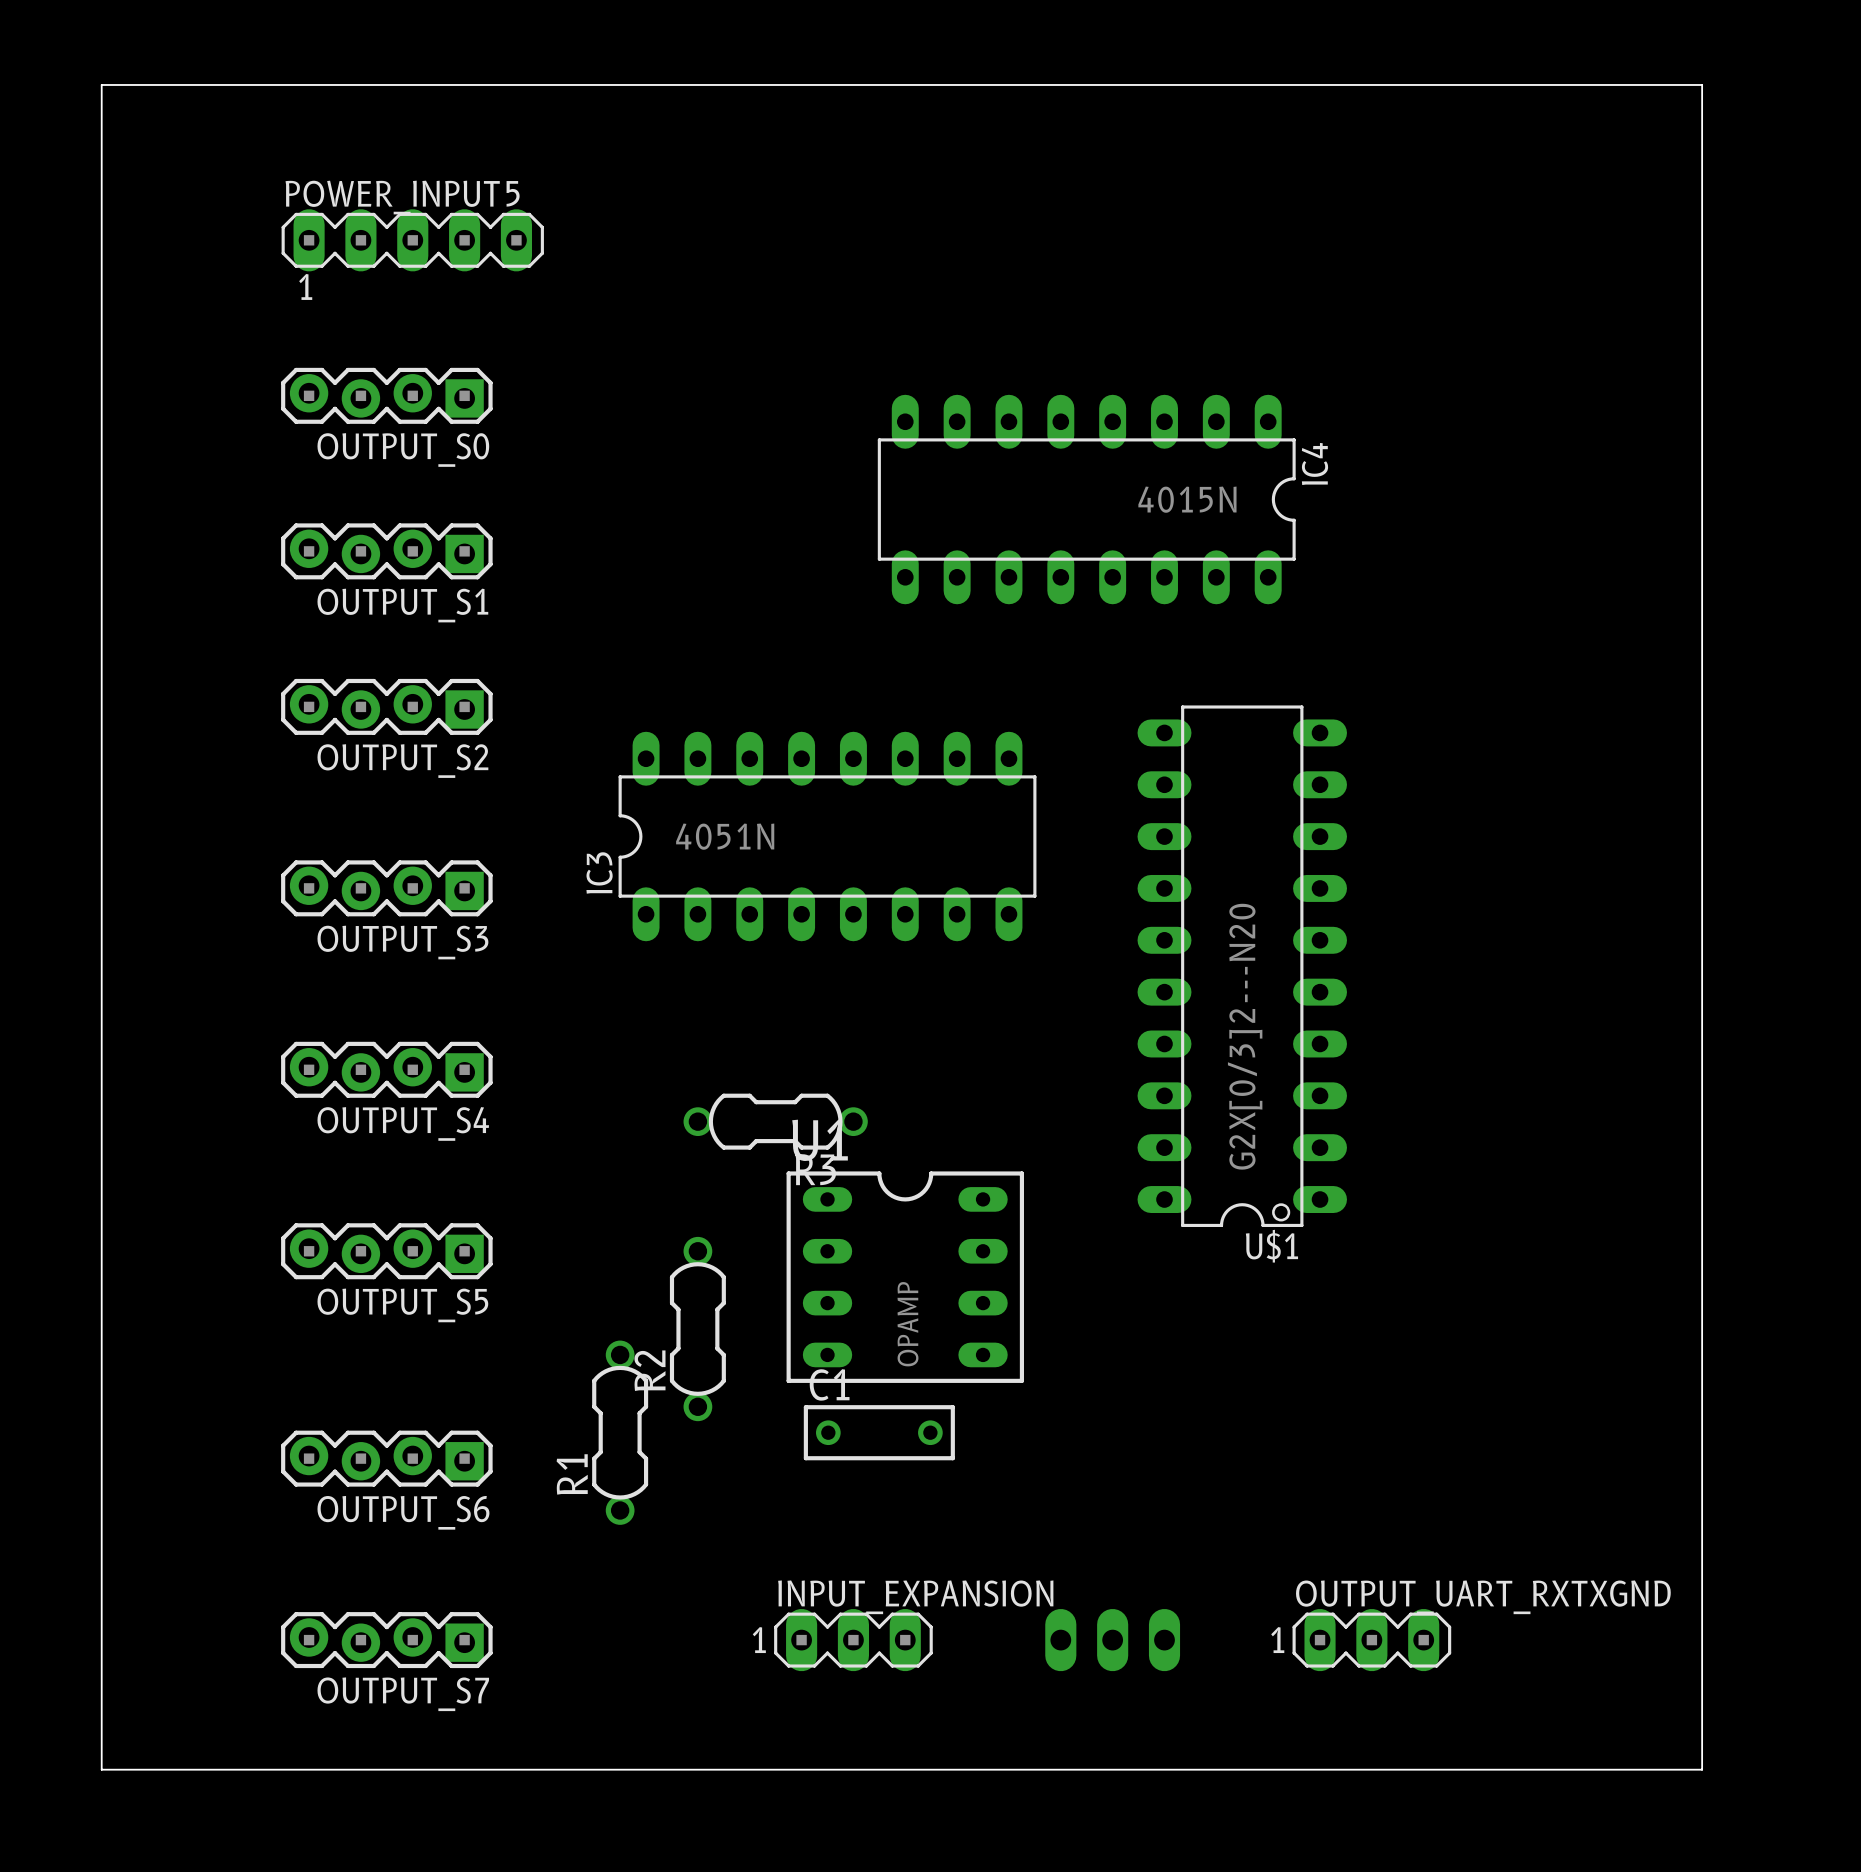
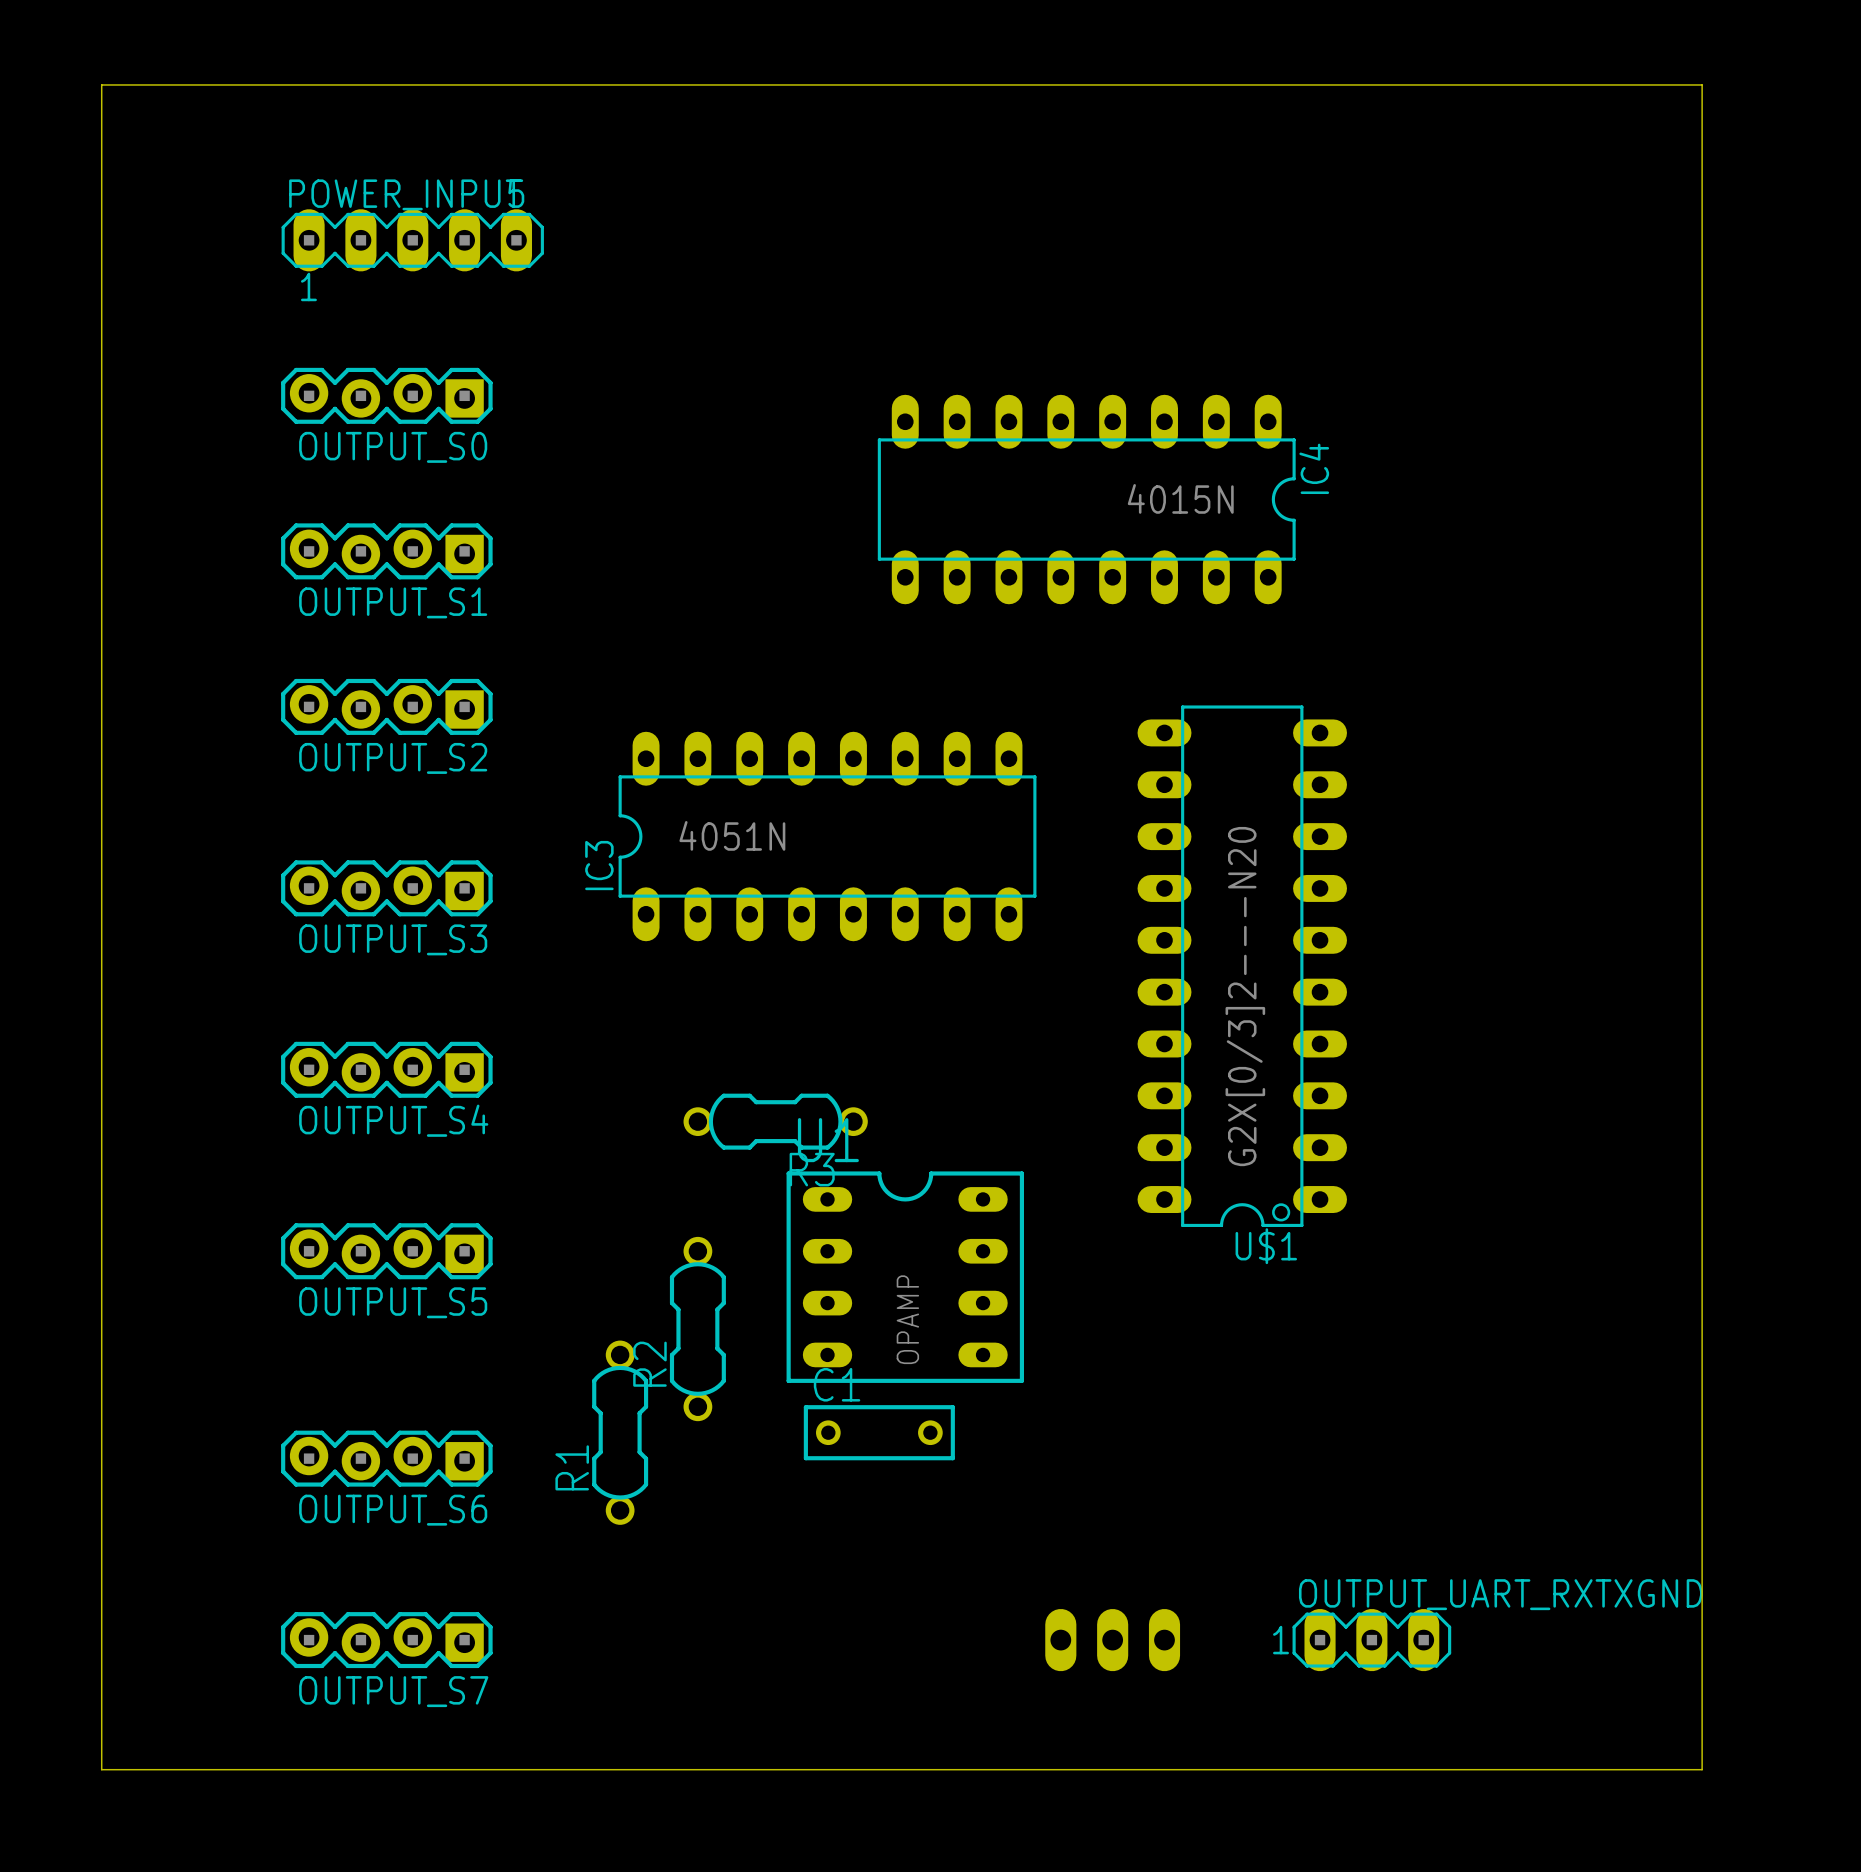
INPUT_EXPANSION: (853, 1640) -> none

